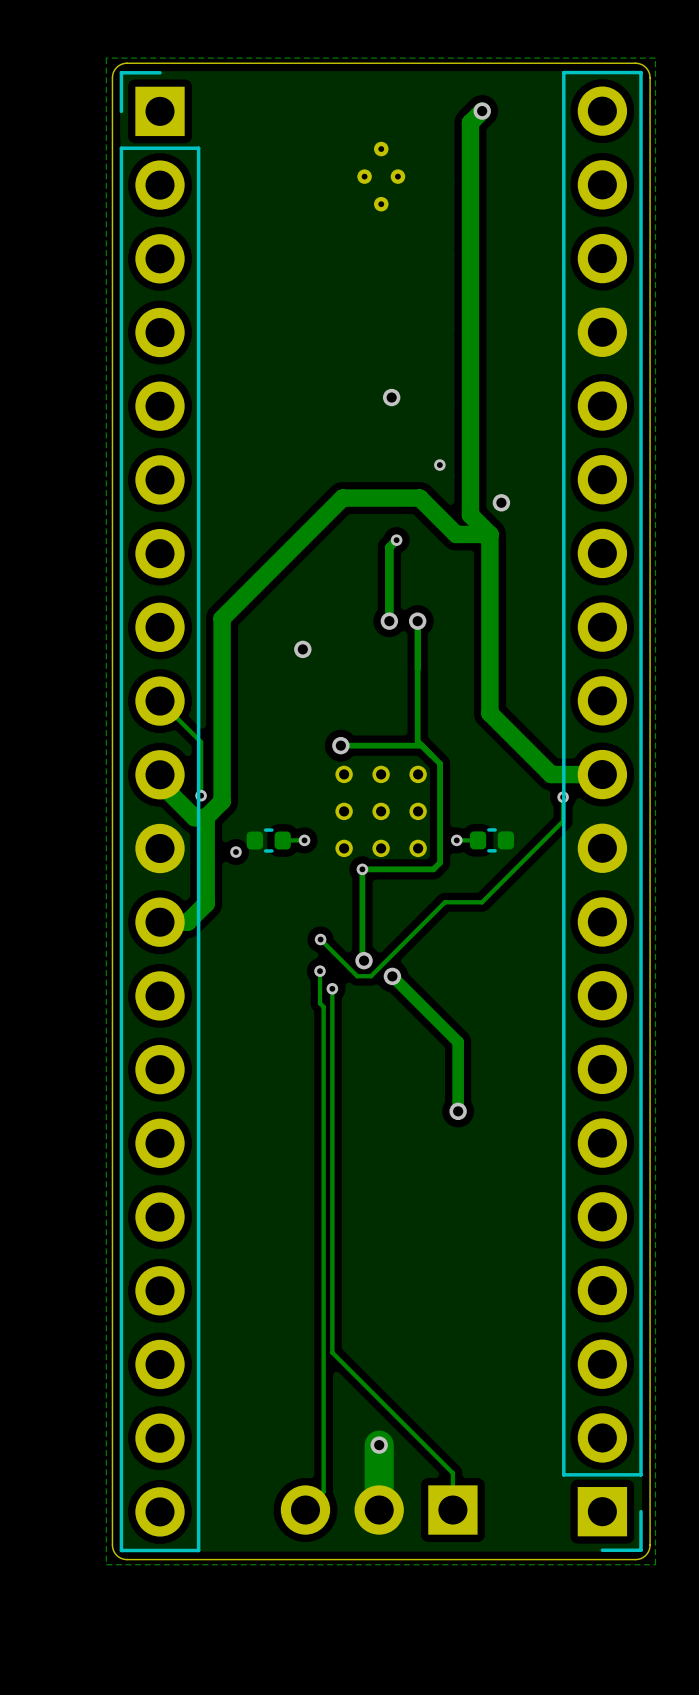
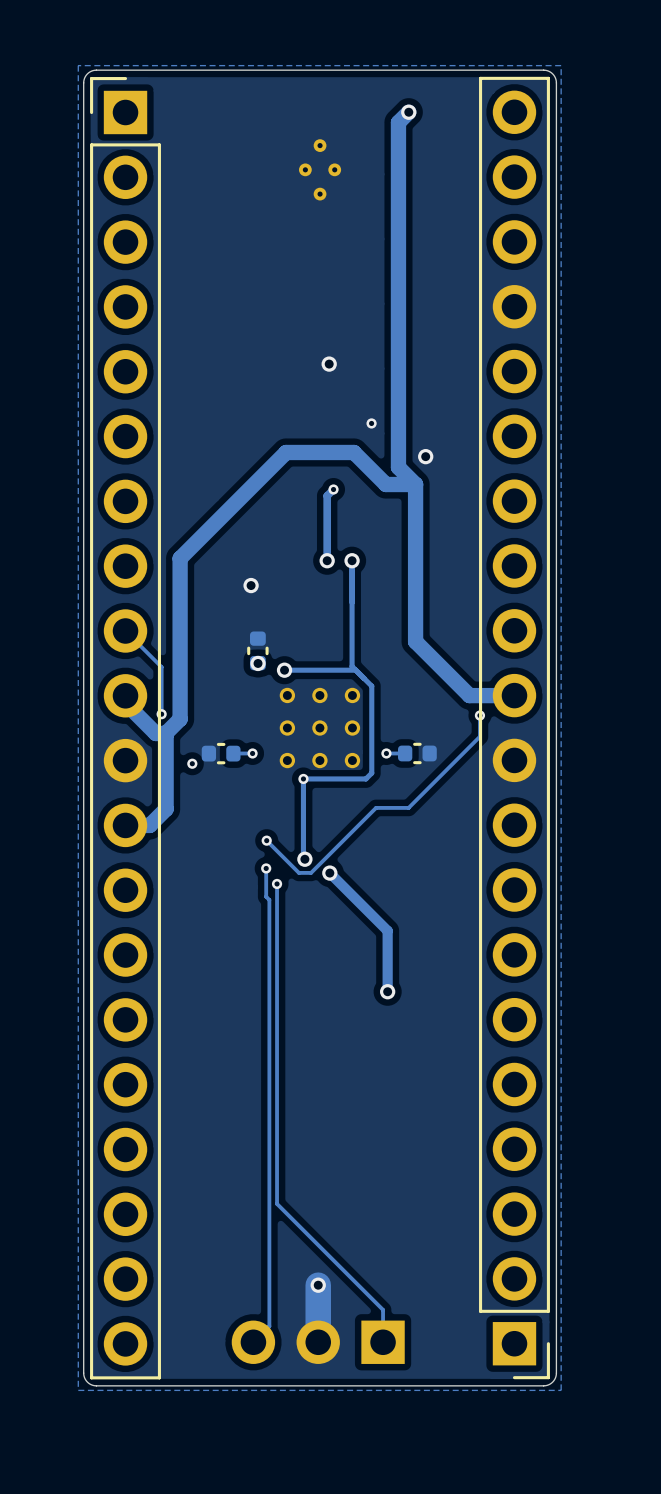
part: none -> (257, 650)
via: none -> (258, 663)

